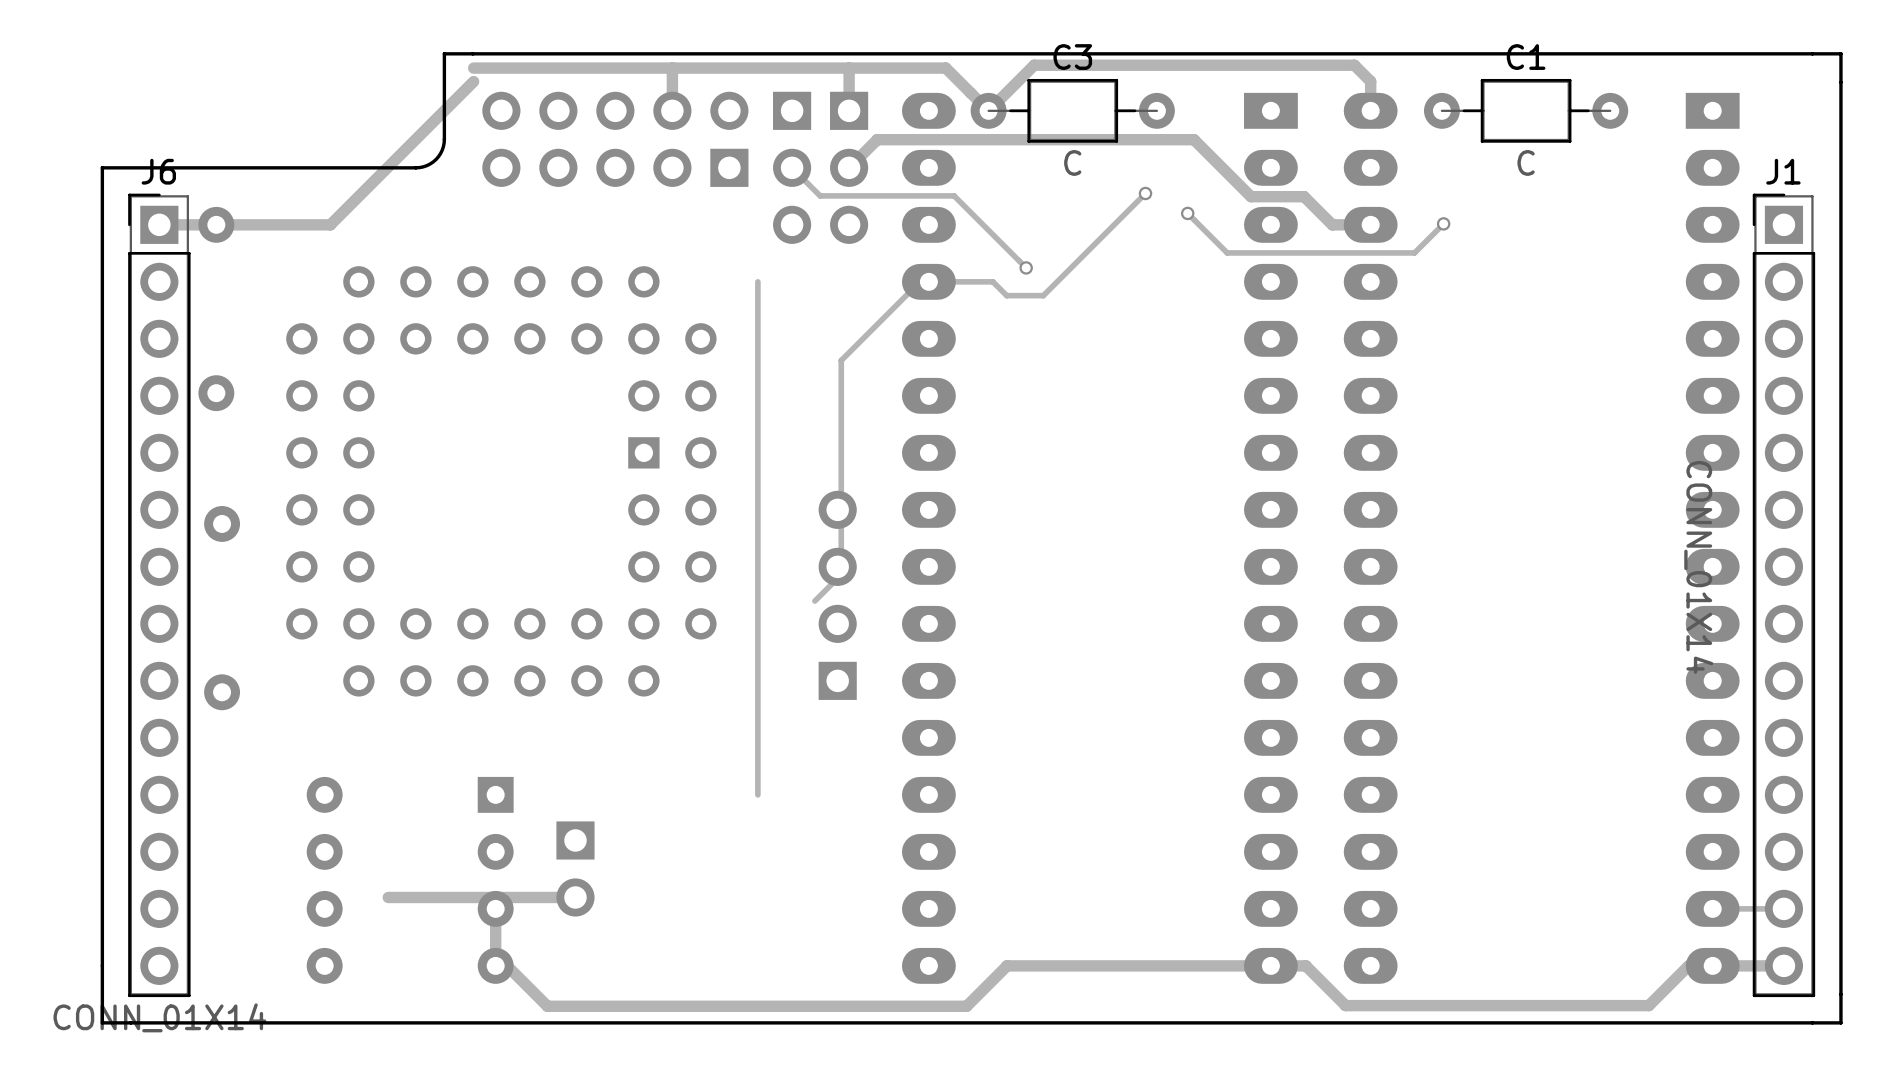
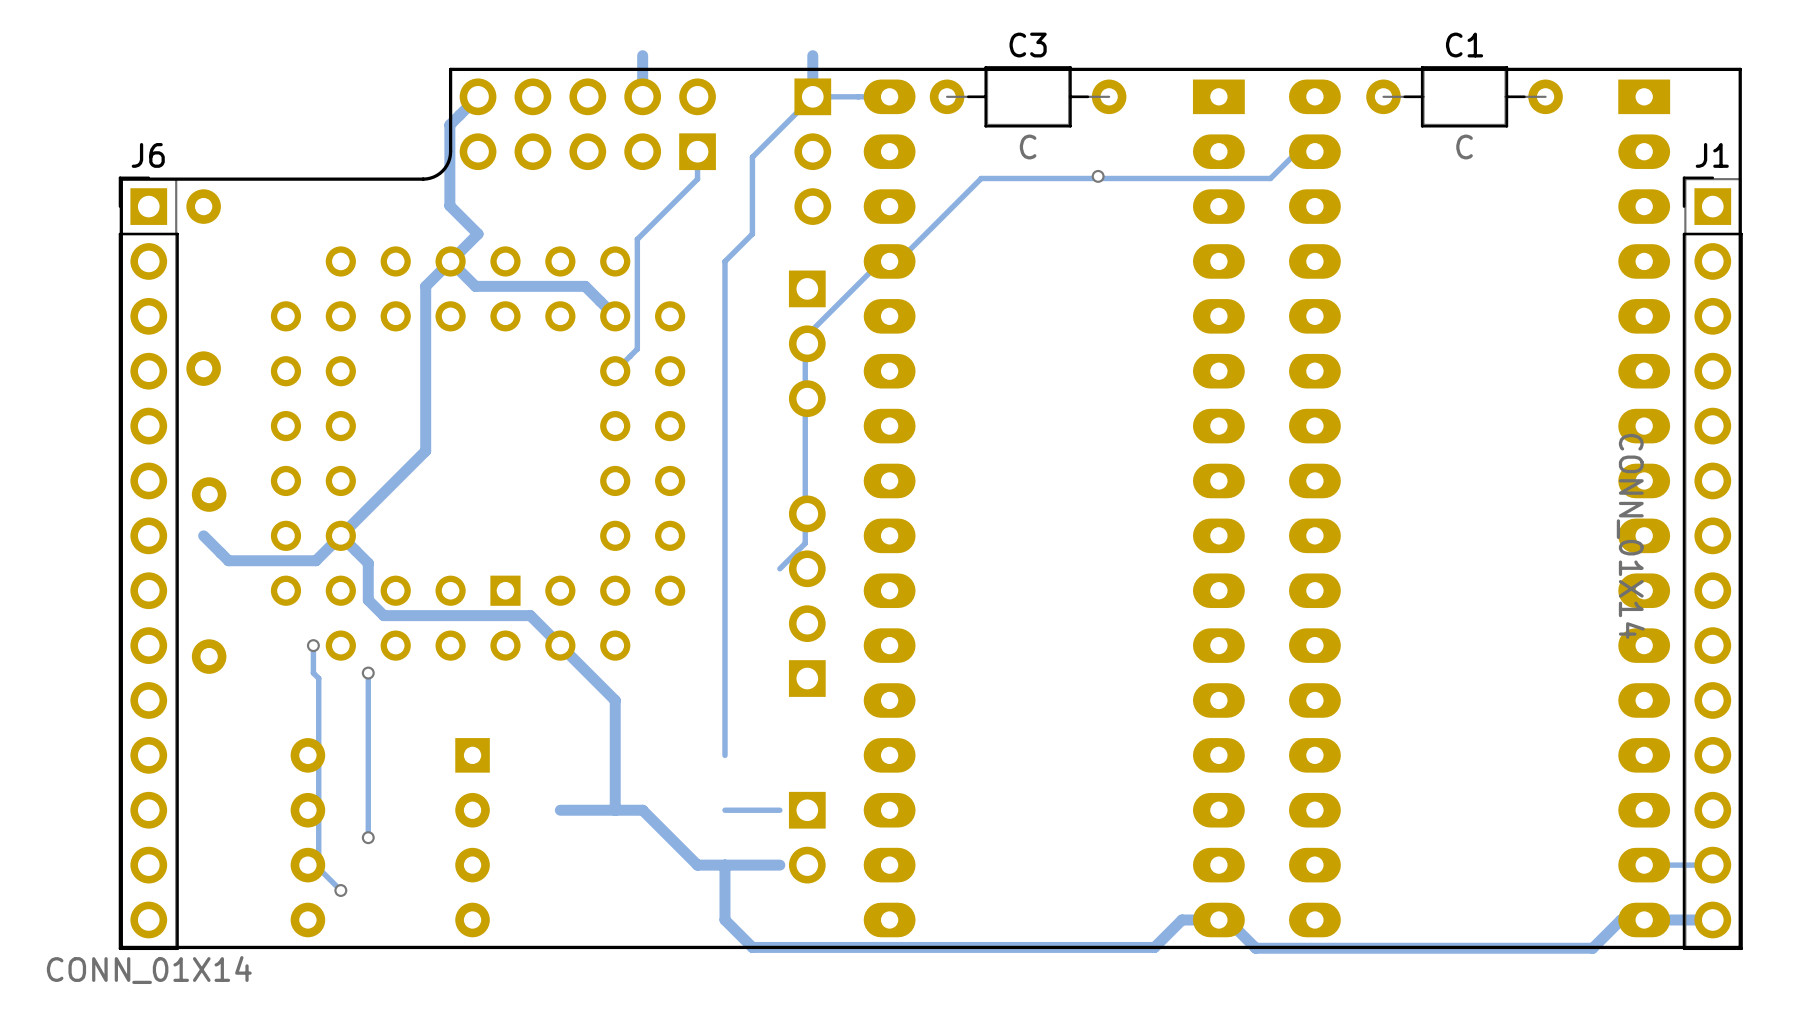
board edge: (1840, 53) (444, 53) (444, 143) (436, 159) (423, 166) (102, 167) (102, 1022) (1840, 1022) (1840, 53) -> (1740, 69) (1740, 947) (121, 947) (121, 179) (430, 178) (442, 171) (450, 155) (450, 69) (1740, 69)
track: (473, 68) (945, 68) (988, 110) (1034, 65) (1354, 65) (1370, 81) (1370, 110) -> none
track: (473, 81) (330, 224) (159, 224) -> none
track: none -> (478, 96) (449, 125) (449, 205) (478, 234) (425, 286) (425, 450) (315, 560) (228, 560) (203, 535)
track: none -> (889, 96) (812, 96) (752, 157) (752, 234) (724, 261)
track: none -> (697, 151) (697, 179) (637, 239) (637, 349) (615, 371)
track: (792, 167) (820, 195) (954, 195) (1026, 267) -> none
part position: (792, 167) -> (807, 343)
track: (849, 167) (877, 139) (1194, 139) (1251, 196) (1304, 196) (1332, 224) (1370, 224) -> none
track: (1143, 195) (1043, 295) (1006, 295) (992, 281) (937, 281) -> (1328, 151) (1297, 151) (1270, 178) (981, 178) (898, 261)
track: (1187, 213) (1227, 252) (1414, 252) (1443, 223) -> none
via: (1187, 213) -> none
via: (1443, 223) -> none
via: (1026, 267) -> none
track: none -> (450, 261) (475, 286) (585, 286) (615, 316)
part rotation: 0° (501, 481) -> 90° clockwise (478, 453)
track: none -> (340, 535) (368, 563) (368, 600) (383, 615) (530, 615) (615, 700) (615, 810)
part position: (837, 595) -> (807, 596)
track: none -> (313, 645) (313, 673) (318, 678) (318, 868) (340, 890)
via: none -> (313, 645)
track: none -> (368, 673) (368, 837)
via: none -> (368, 673)
track: none -> (560, 810) (642, 810) (697, 865) (779, 865)
track: none -> (779, 810) (724, 810)
part position: (575, 868) -> (807, 837)
via: none -> (368, 837)
track: (495, 897) (495, 954) (547, 1006) (966, 1006) (1007, 965) (1232, 965) -> (724, 865) (724, 919) (752, 947) (1154, 947) (1181, 919)
track: (575, 897) (388, 897) -> none
via: none -> (340, 890)
track: (1279, 965) (1305, 965) (1345, 1005) (1648, 1005) (1659, 995) -> (1227, 919) (1255, 948) (1592, 948)

